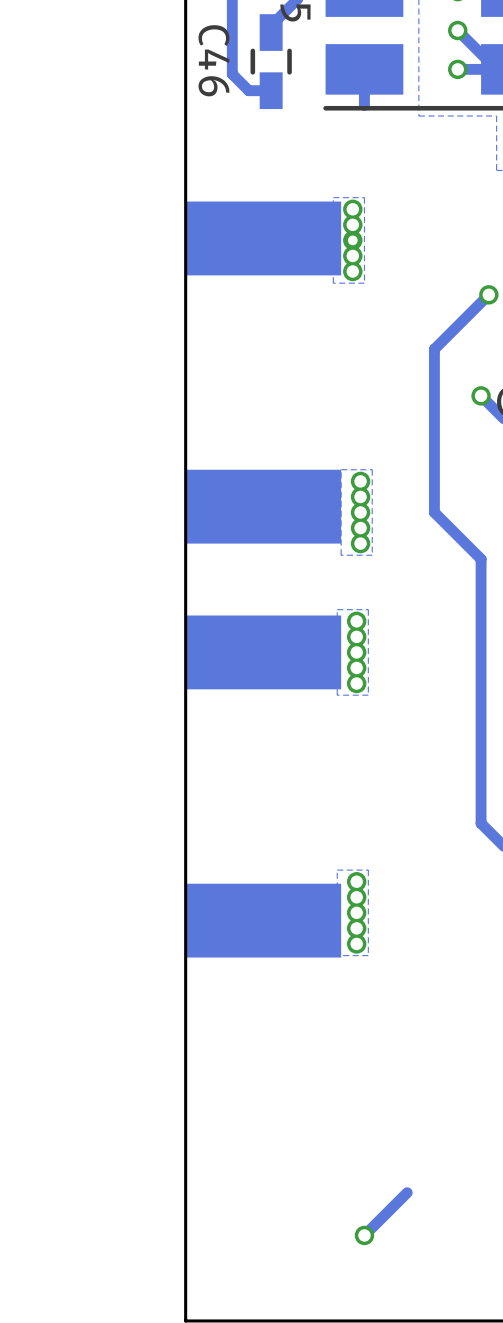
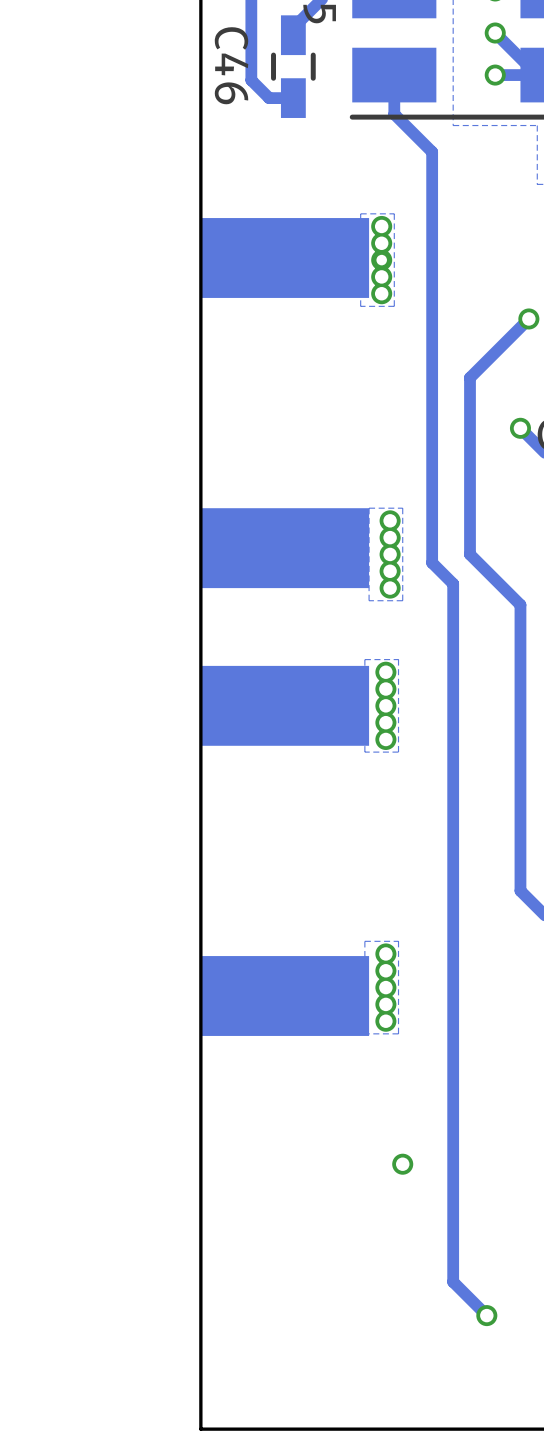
track: none -> (394, 114) (432, 152) (432, 562) (453, 583) (453, 1281) (486, 1315)
via: none -> (402, 1164)
track: (407, 1192) (364, 1235) -> none
via: none -> (486, 1315)
via: (364, 1235) -> none

